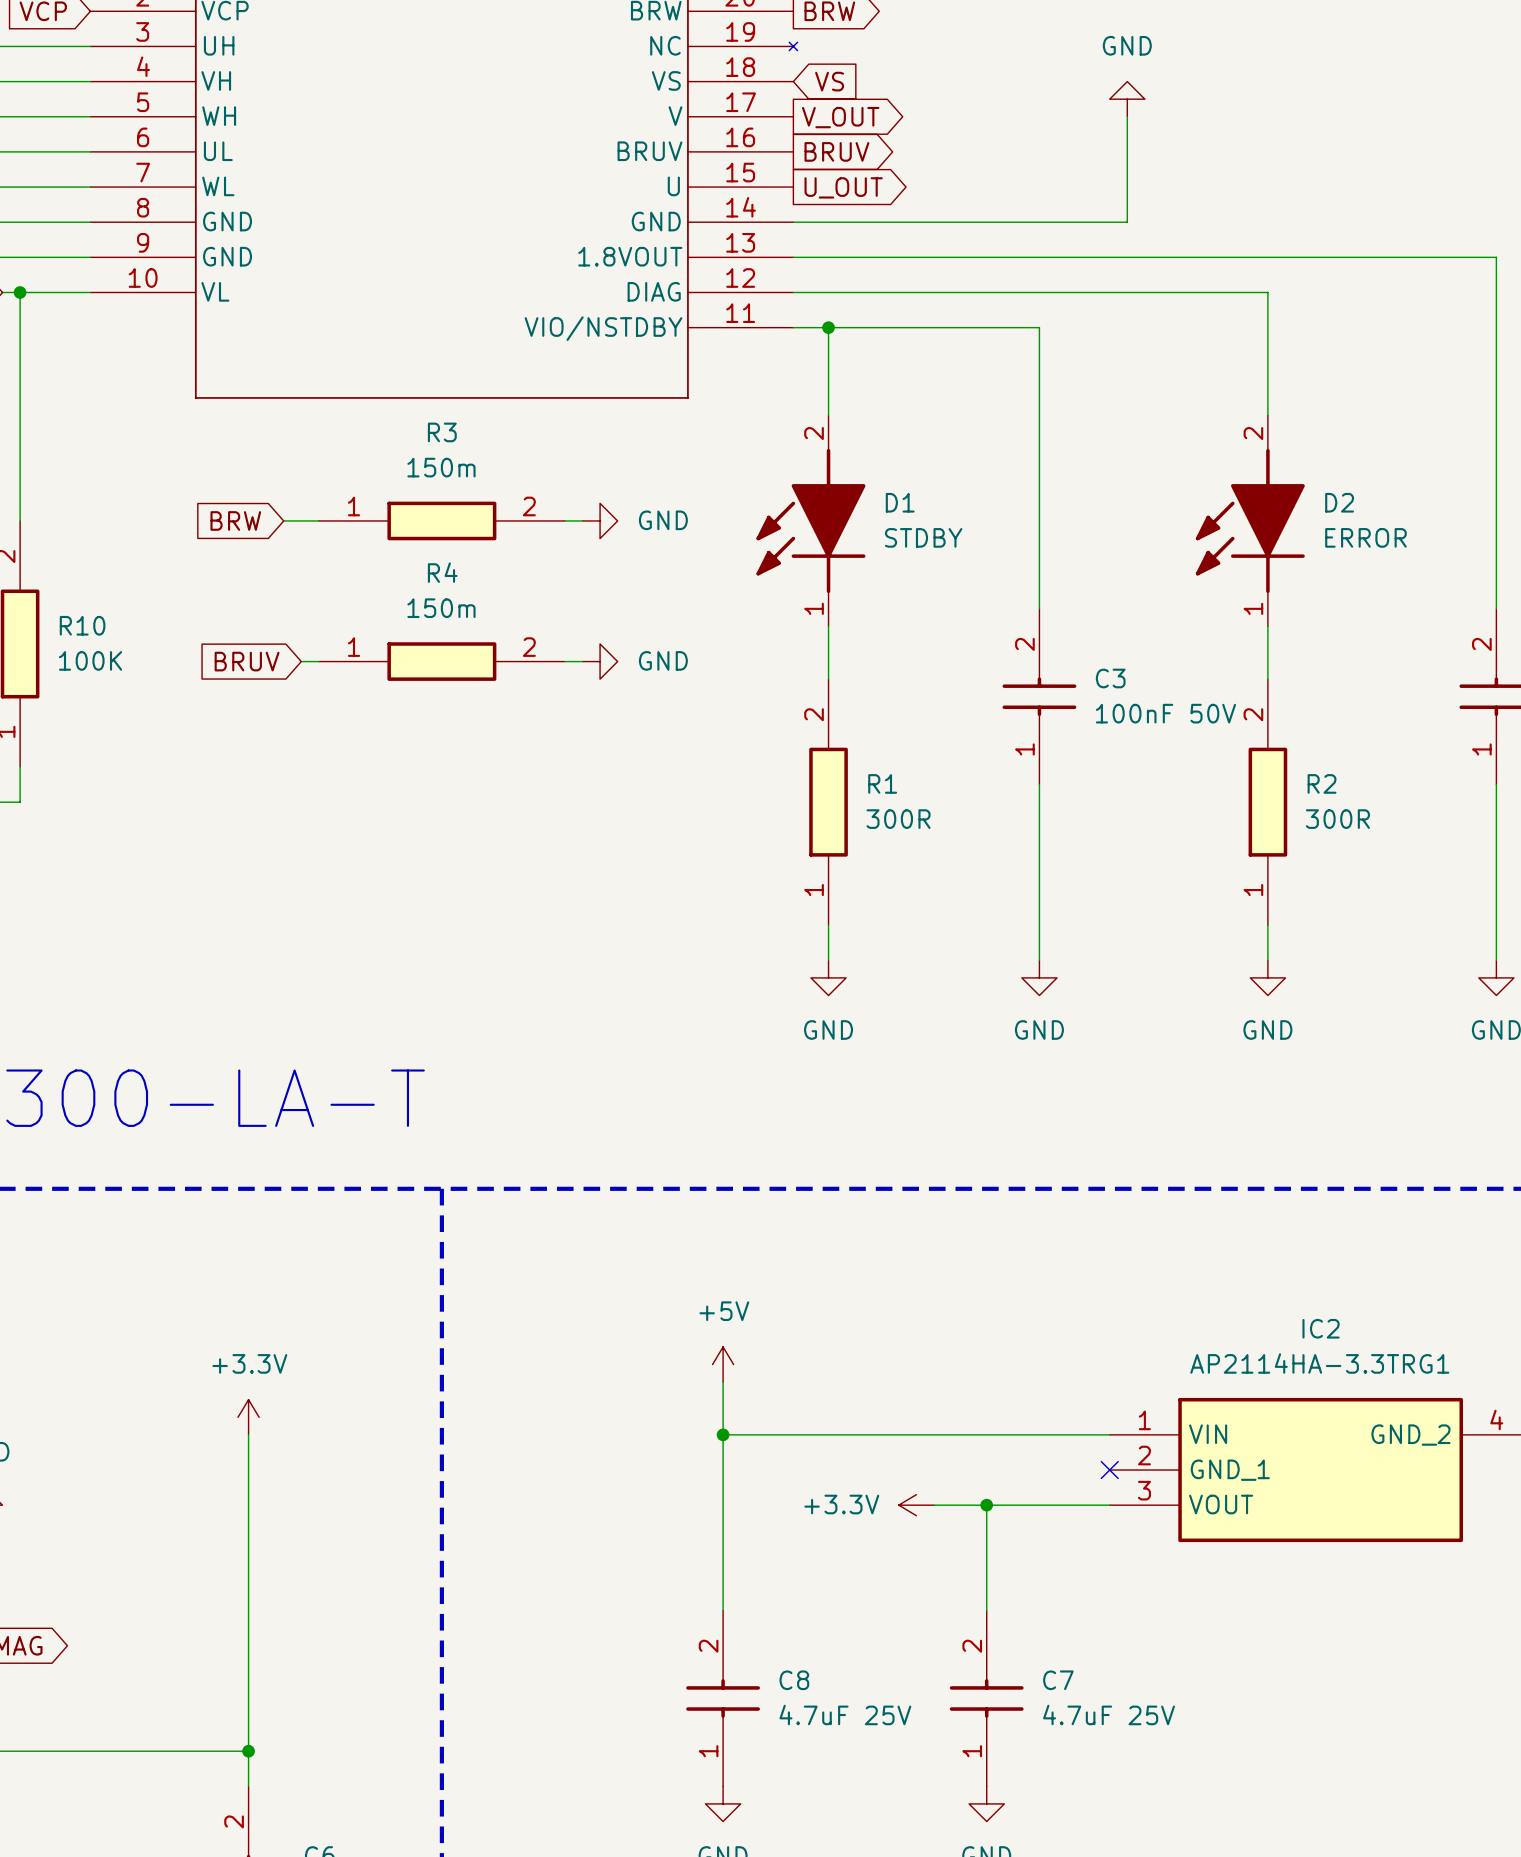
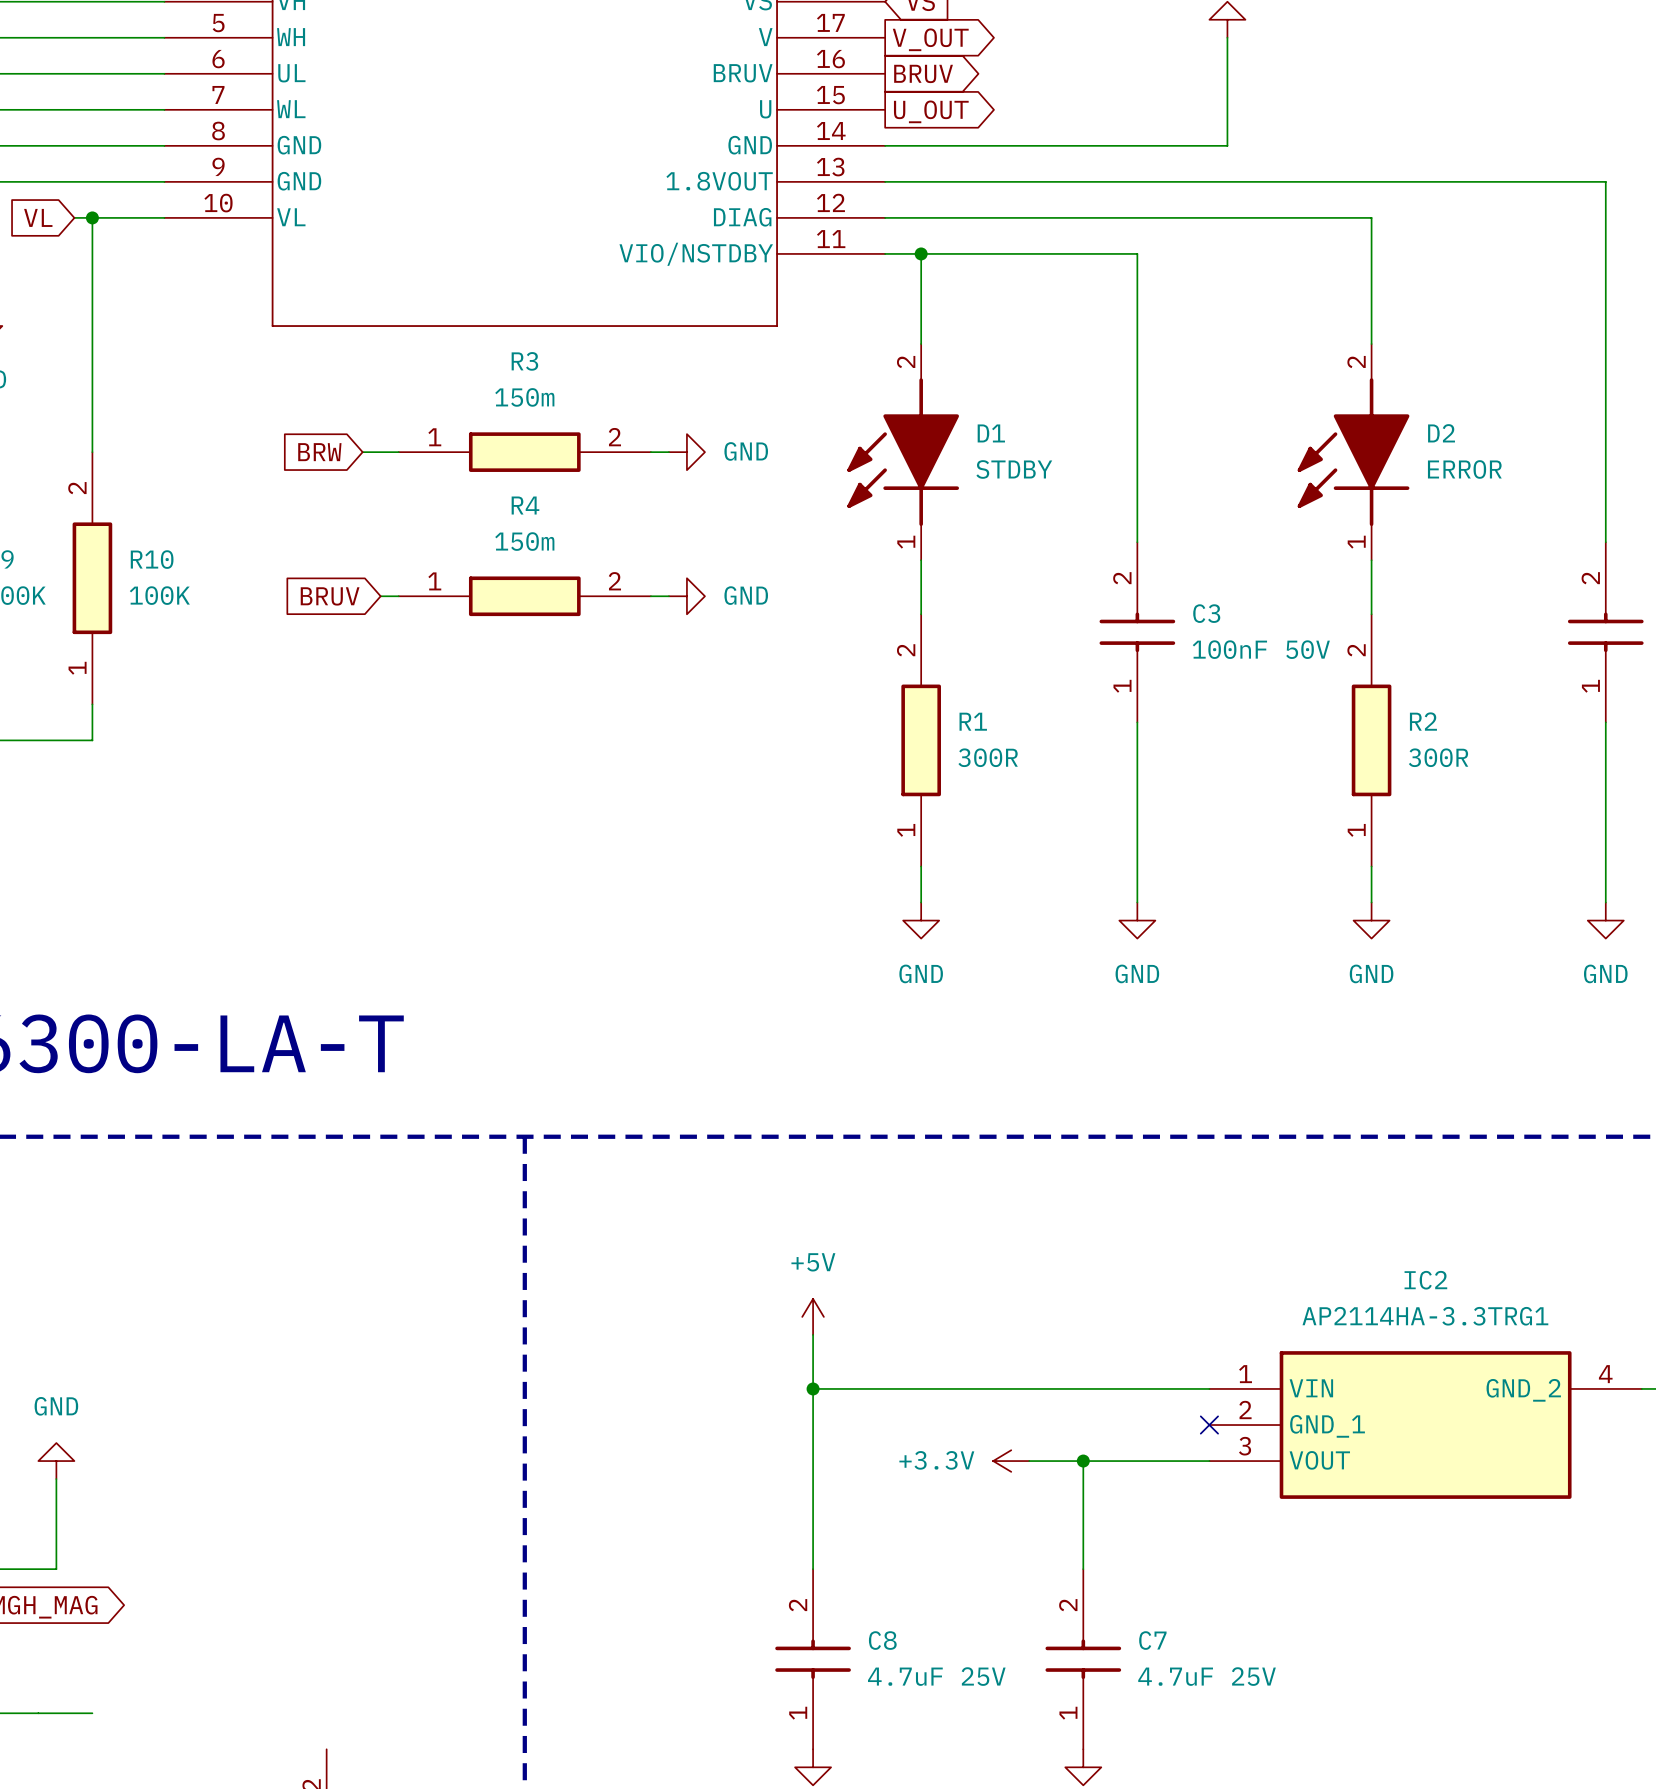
power symbol: +3.3V (248, 1417) -> none
wire: (248, 1434) (248, 1786) -> none
wire: (20, 1751) (248, 1751) -> none
junction: (248, 1751) -> none

